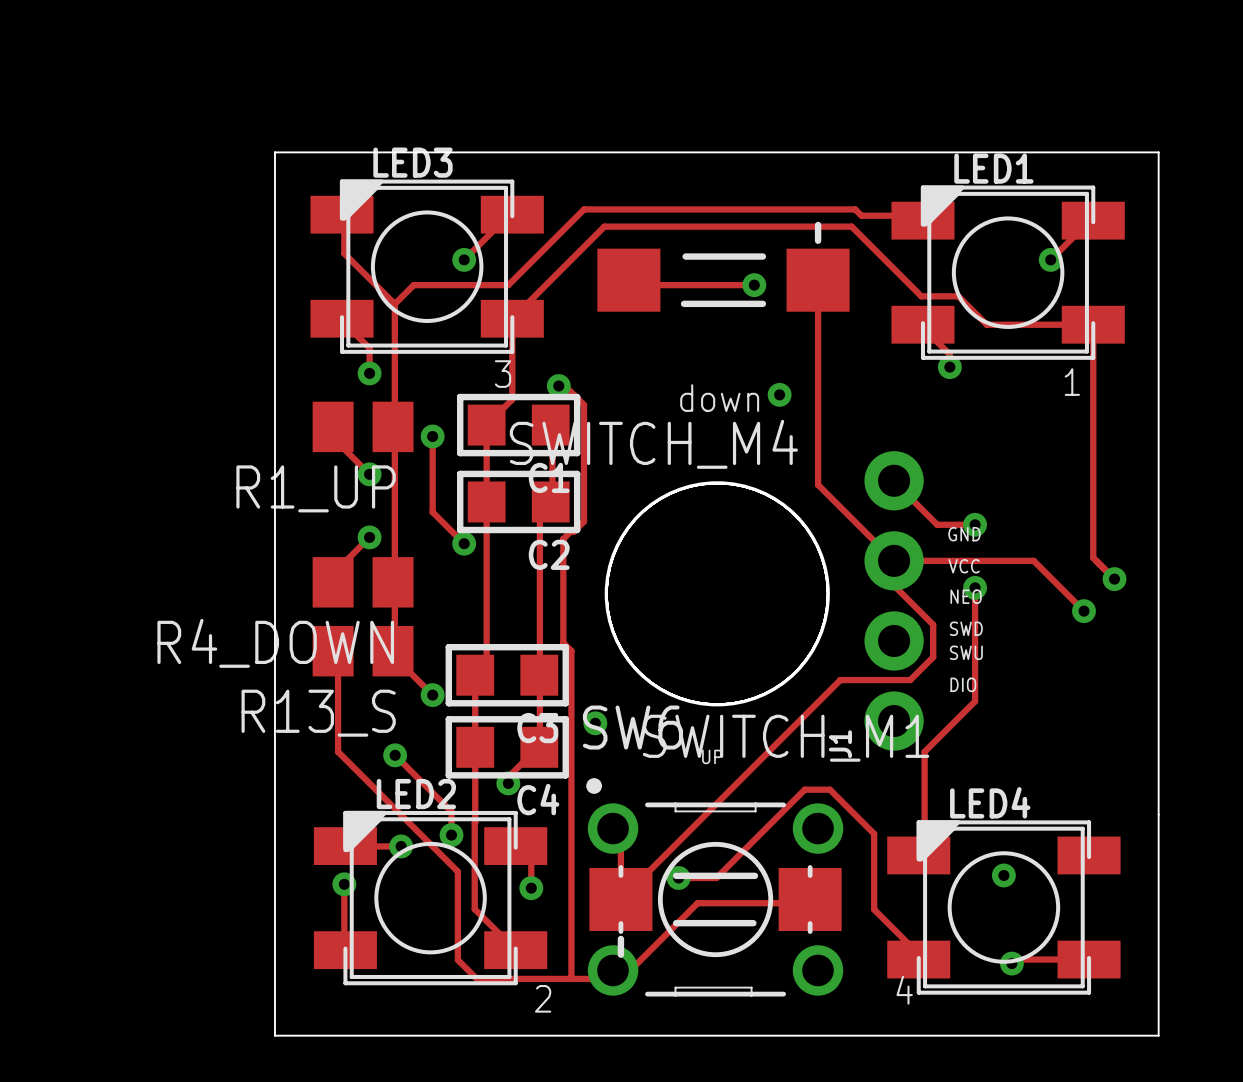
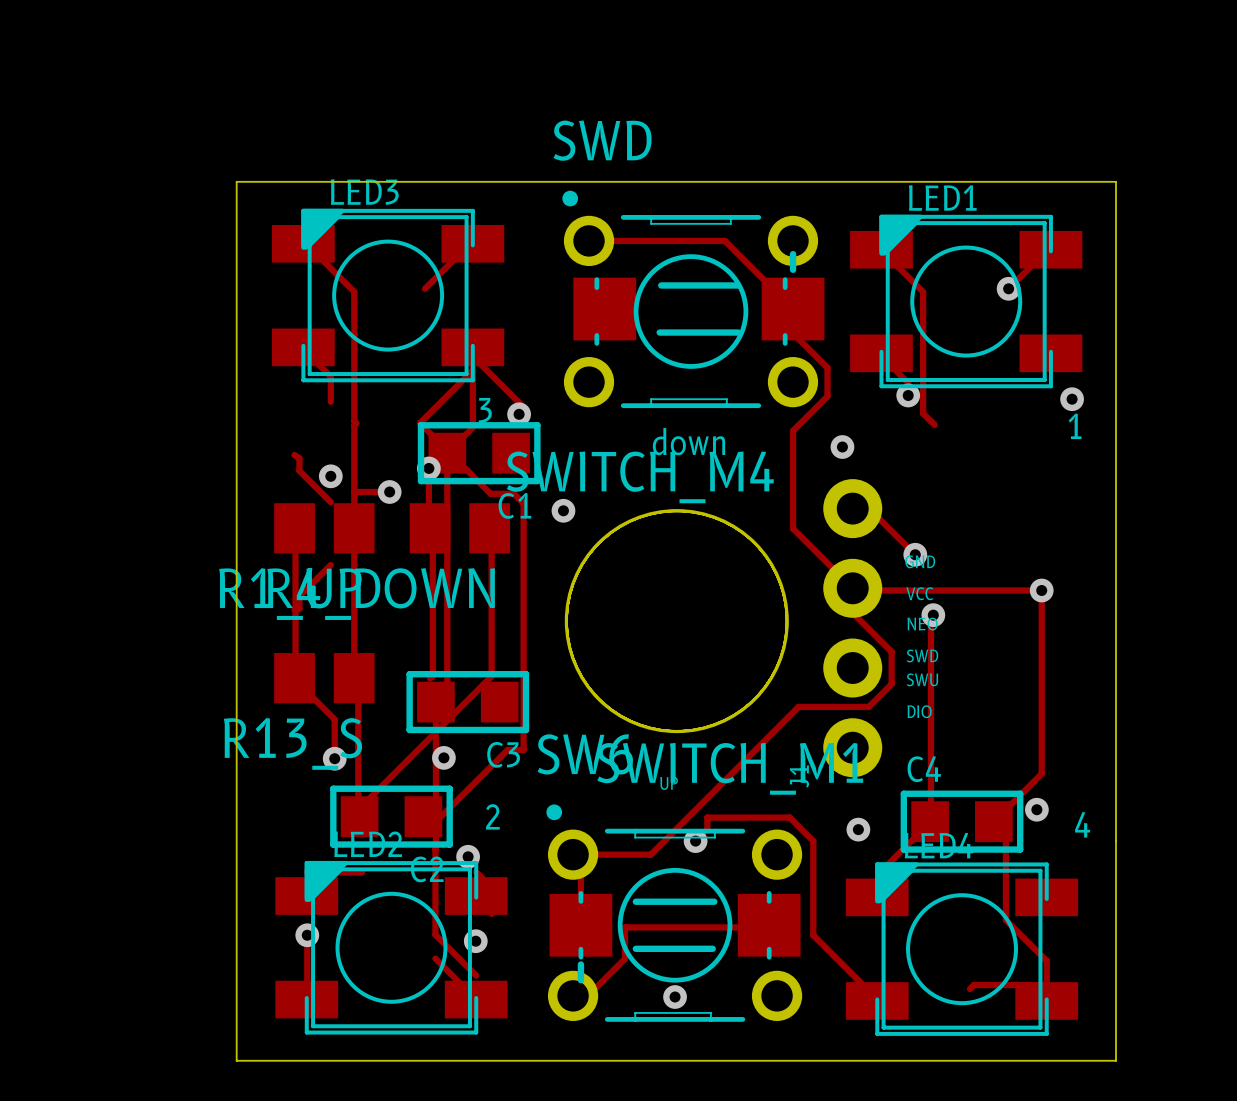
track: (342, 214) (344, 215) (344, 253) (394, 304) -> (303, 243) (307, 244) (354, 291) (354, 421) (356, 423) (354, 425) (354, 678) (358, 684) (358, 813) (359, 816) (358, 809) (487, 680) (489, 678) (491, 676) (491, 531) (489, 528)
track: (922, 220) (918, 215) (861, 215) (855, 209) (584, 209) (508, 285) (413, 285) (394, 304) -> (881, 249) (923, 291) (923, 413) (934, 424)
via: (464, 259) -> none
SWITCH_M4 position: (723, 266) -> (698, 295)
SWD: none -> (690, 299)
track: (628, 280) (634, 285) (754, 285) -> none
track: (818, 280) (818, 484) (834, 500) -> (589, 240) (724, 240) (793, 309) (793, 333) (827, 367) (827, 396) (793, 430) (793, 528)
via: (754, 285) -> none
track: (394, 304) (394, 423) (393, 426) (394, 430) (394, 581) (393, 582) (394, 587) (394, 650) (393, 651) (394, 657) (432, 695) -> none
track: (512, 318) (604, 226) (851, 226) (921, 296) (958, 296) (986, 324) (1093, 324) (1093, 557) (1114, 579) -> none
track: none -> (472, 356) (523, 407)
via: none -> (1072, 399)
via: (369, 373) -> none
text position: 3 (503, 374) -> 3 (485, 410)
text position: 1 (1072, 382) -> 1 (1075, 426)
track: (558, 386) (565, 386) (584, 404) (584, 521) (563, 539) -> (472, 370) (419, 423) (490, 493) (513, 493) (523, 503) (523, 566)
via: (779, 394) -> none
text position: down (719, 398) -> down (688, 441)
via: none -> (842, 447)
track: (550, 425) (552, 430) (552, 499) (539, 512) (539, 745) (508, 777) (508, 783) -> none
R1_UP position: (363, 426) -> (324, 528)
track: (432, 436) (432, 512) (464, 543) -> none
via: (432, 436) -> none
track: none -> (428, 468) (428, 527) (432, 531) (432, 676) (430, 678)
via: none -> (428, 468)
track: none -> (354, 491) (389, 491)
via: none -> (389, 491)
via position: (369, 474) -> (330, 476)
track: (894, 480) (937, 524) (975, 524) -> (852, 508) (856, 511) (872, 511) (915, 554)
via: none -> (563, 510)
track: none -> (294, 528) (294, 678) (334, 719) (334, 758)
C2 position: (518, 501) -> (391, 816)
via position: (975, 524) -> (915, 554)
via: (369, 537) -> none
via: (464, 543) -> none
track: (894, 560) (1033, 560) (1084, 611) -> (852, 588) (854, 590) (1041, 590) (1041, 773) (993, 821) (1005, 833) (1005, 920) (1046, 960) (1046, 1000)
via: none -> (1041, 590)
via: (1114, 579) -> none
R4_DOWN position: (363, 582) -> (459, 528)
track: none -> (930, 613) (930, 821) (879, 872) (879, 896) (877, 897)
track: (975, 587) (975, 701) (924, 751) (924, 852) (918, 855) -> none
via: (1084, 611) -> none
track: (563, 642) (571, 650) (571, 978) -> (523, 669) (523, 749) (507, 749) (432, 825)
track: (333, 651) (338, 657) (338, 751) (457, 871) (457, 959) (476, 978) (602, 978) (615, 966) (634, 966) (697, 903) (804, 903) (810, 899) -> (573, 995) (574, 994) (589, 994) (625, 958) (625, 927) (766, 927) (769, 925)
track: (840, 680) (620, 899) -> (799, 706) (650, 854) (573, 854)
via: (432, 695) -> none
via: (595, 723) -> none
via: none -> (443, 757)
C4 position: (507, 747) -> (962, 821)
track: (395, 755) (451, 811) (451, 835) -> none
via position: (395, 755) -> (334, 758)
via: (508, 783) -> none
via: none -> (1036, 809)
C4 name position: C4 (538, 799) -> C4 (924, 769)
via: none -> (858, 829)
track: none -> (695, 841) (707, 829) (707, 817) (789, 817) (813, 841) (813, 935) (877, 1000)
via: none -> (695, 841)
via: none -> (468, 856)
via: (451, 835) -> none
via: (401, 846) -> none
via: (1003, 875) -> none
track: (678, 878) (716, 878) (804, 789) (830, 789) (874, 833) (874, 909) (918, 953) (918, 959) -> none
via: (678, 878) -> none
track: (344, 884) (345, 950) -> none
via position: (344, 884) -> (307, 935)
via: (531, 888) -> none
LED2 position: (430, 898) -> (391, 947)
LED4 position: (1003, 907) -> (962, 949)
track: none -> (307, 935) (306, 999)
via: none -> (475, 941)
track: none -> (435, 958) (476, 999)
via: (1011, 963) -> none
via: none -> (675, 997)
text position: 4 (904, 990) -> 4 (1082, 824)
text position: 2 (543, 998) -> 2 (492, 816)

